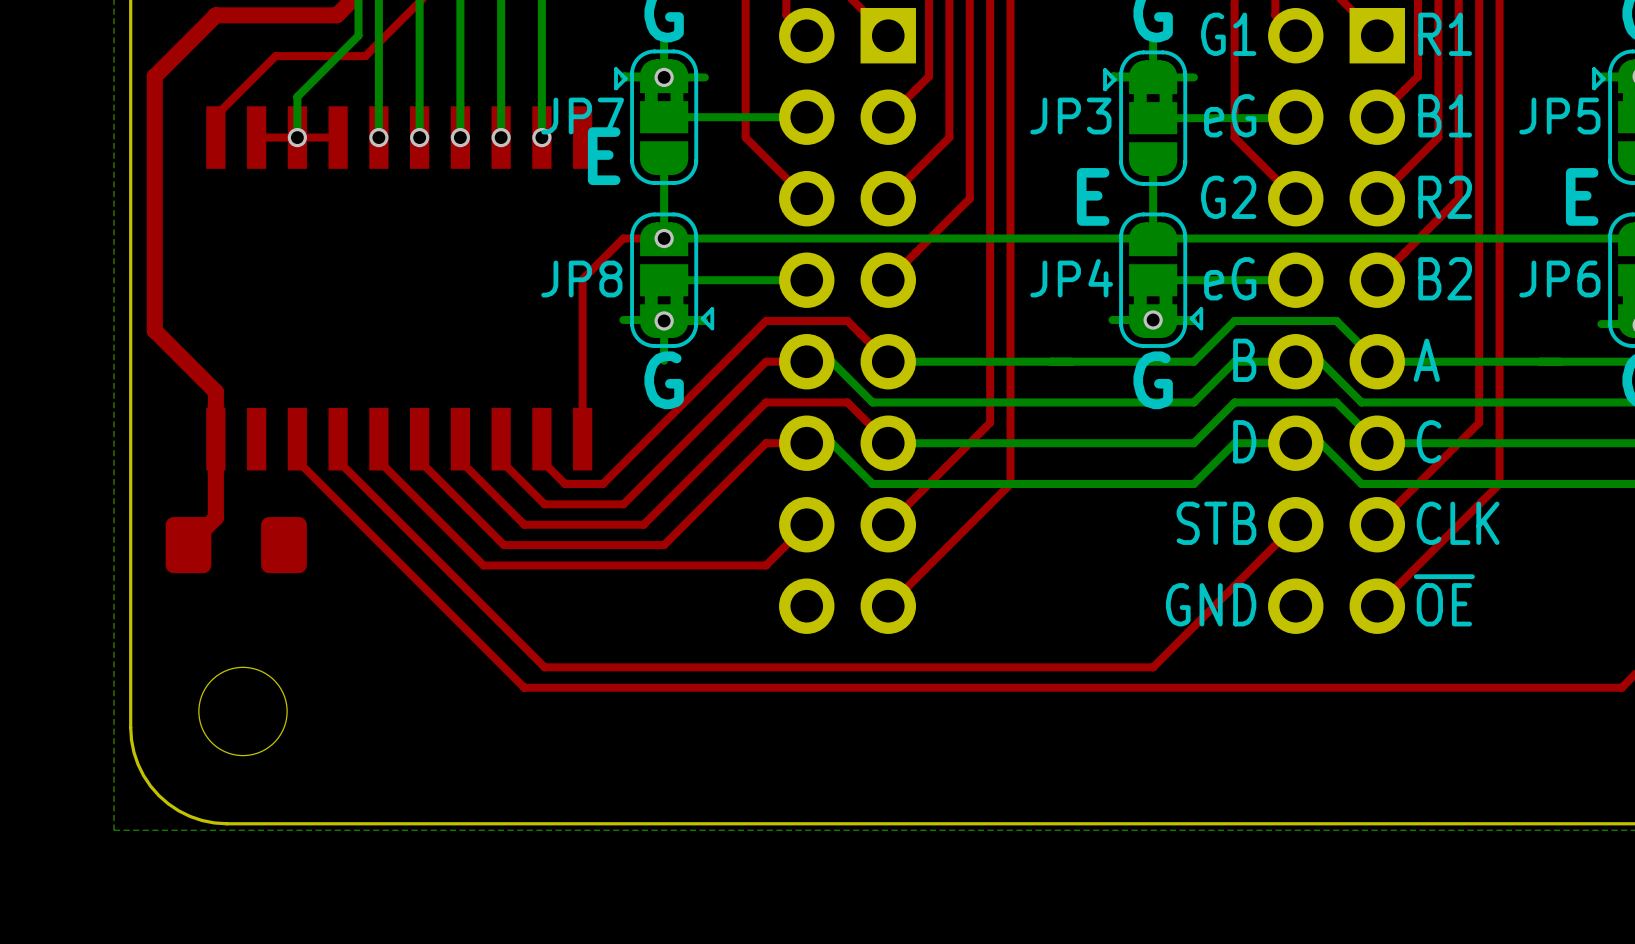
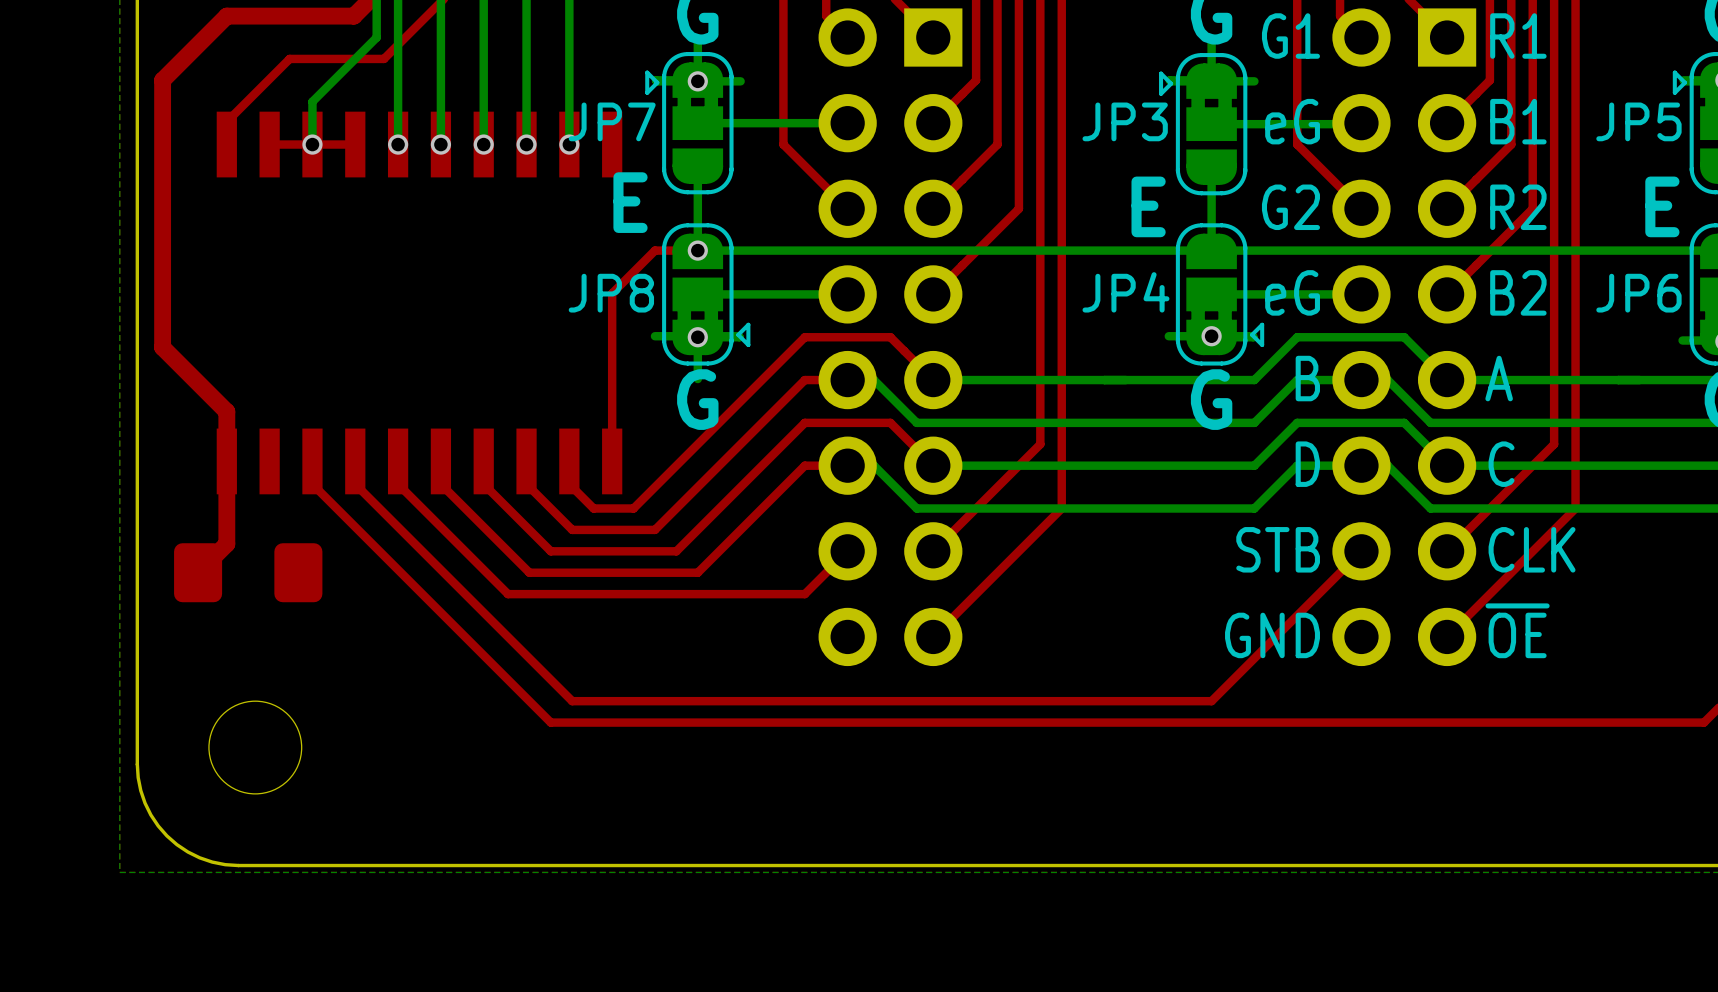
text position: E (604, 156) -> E (630, 202)

